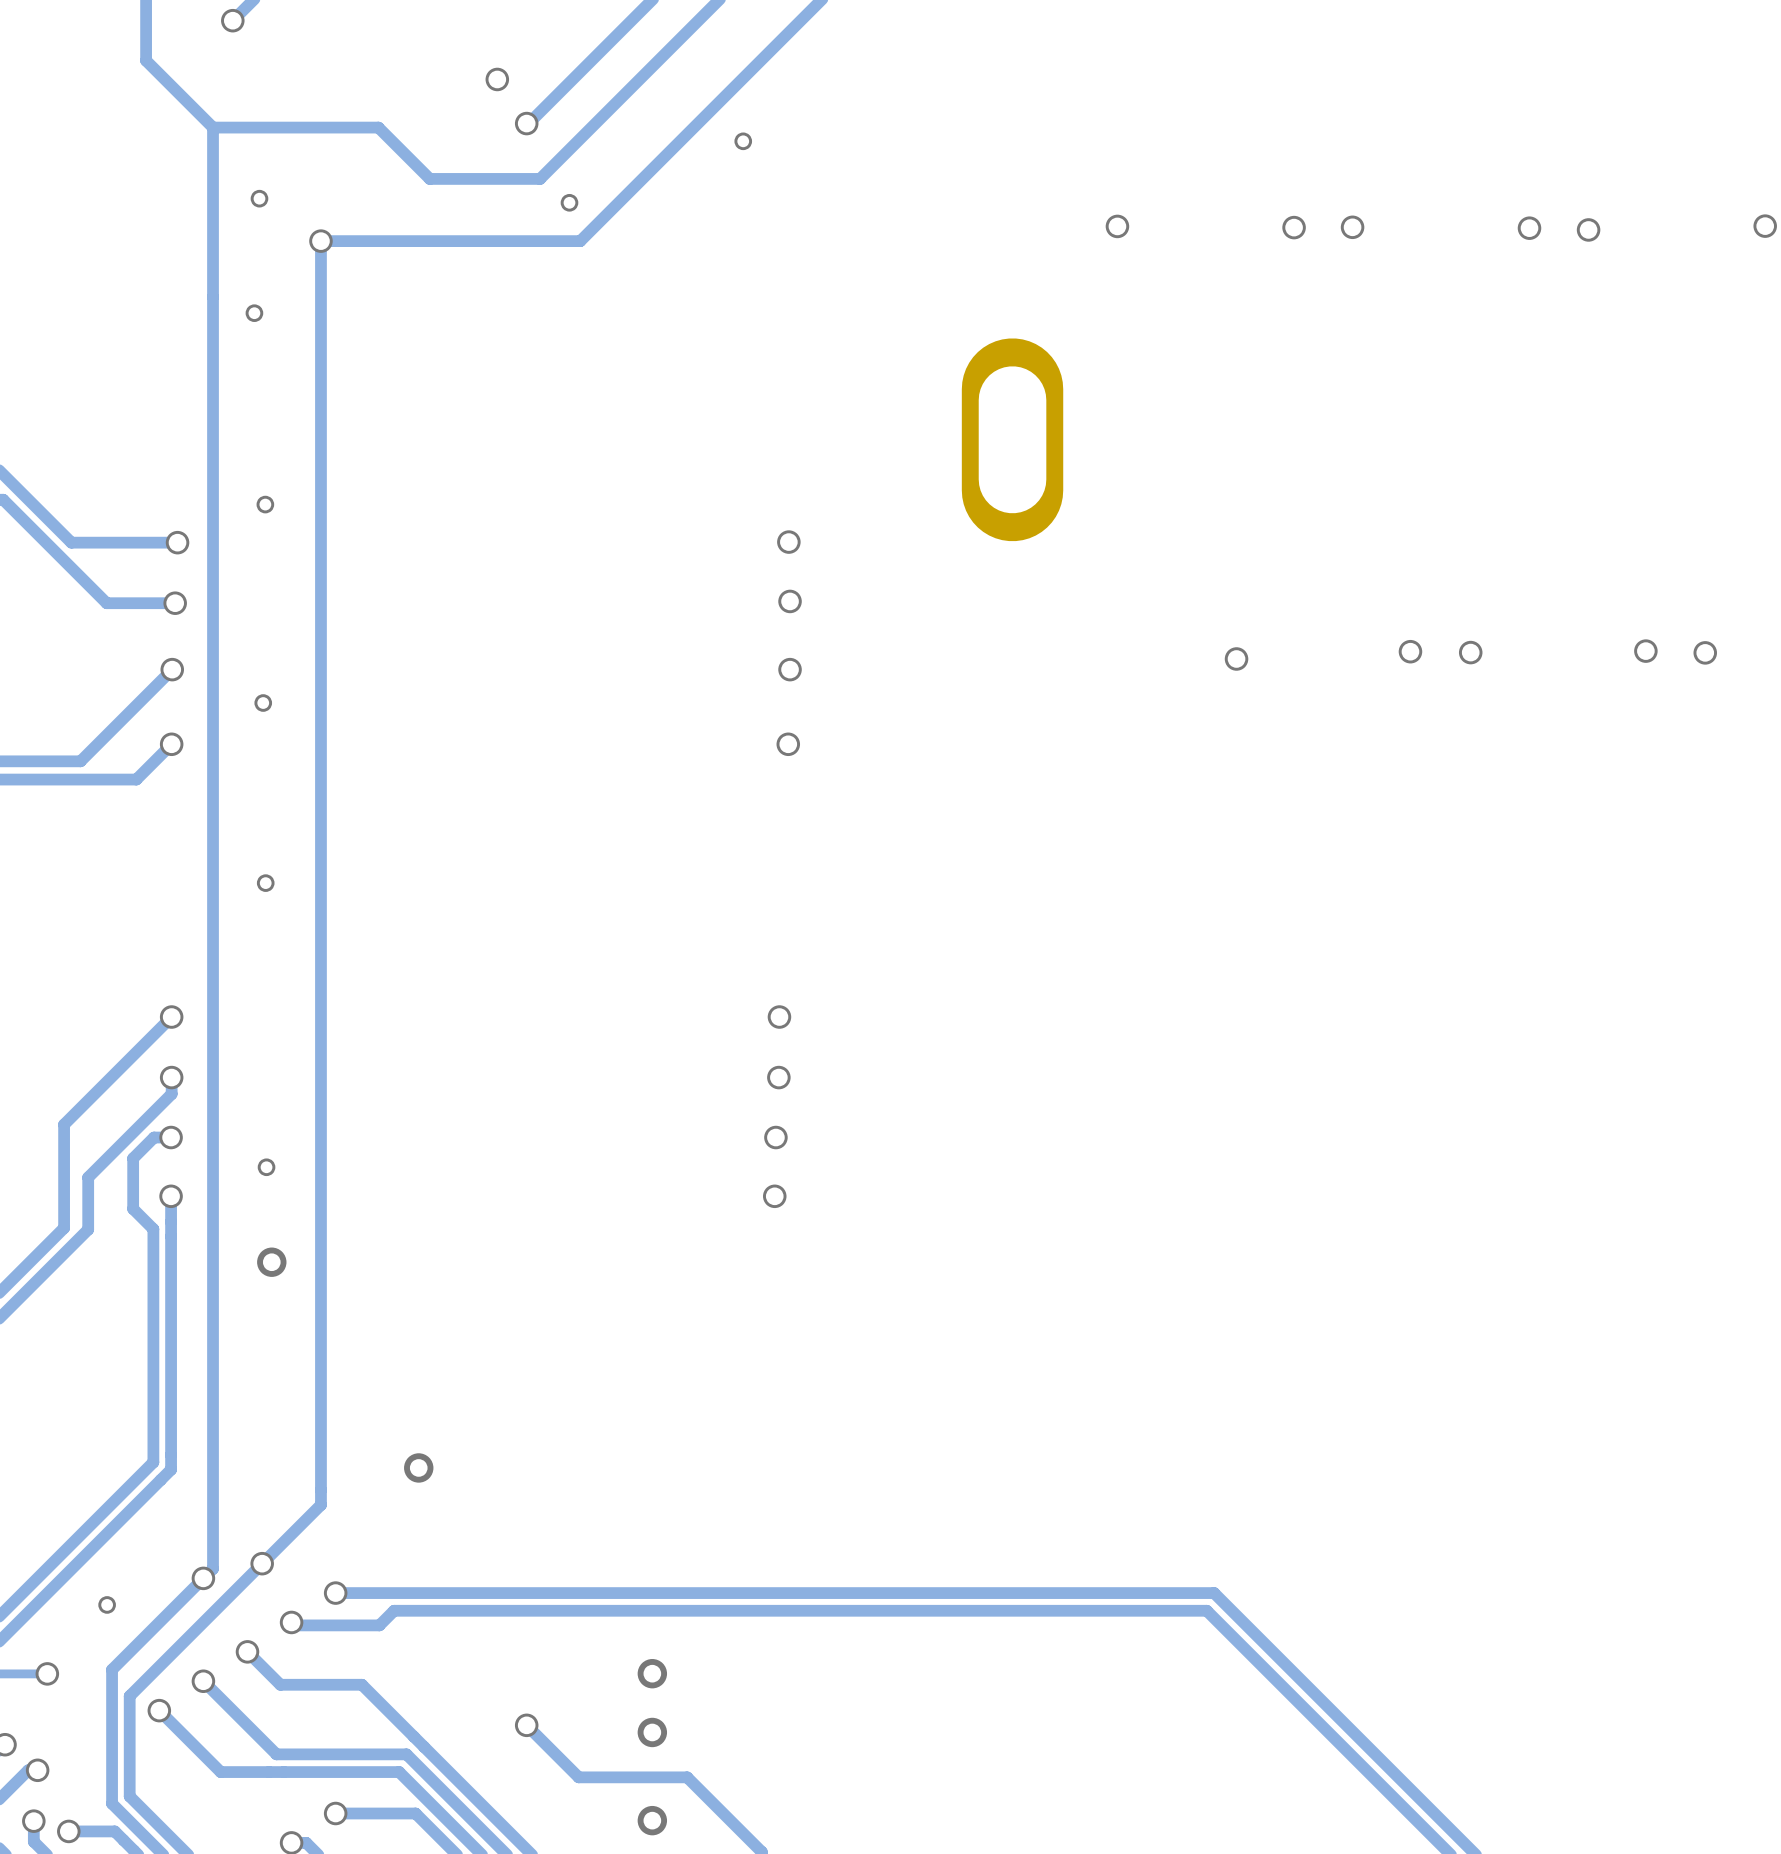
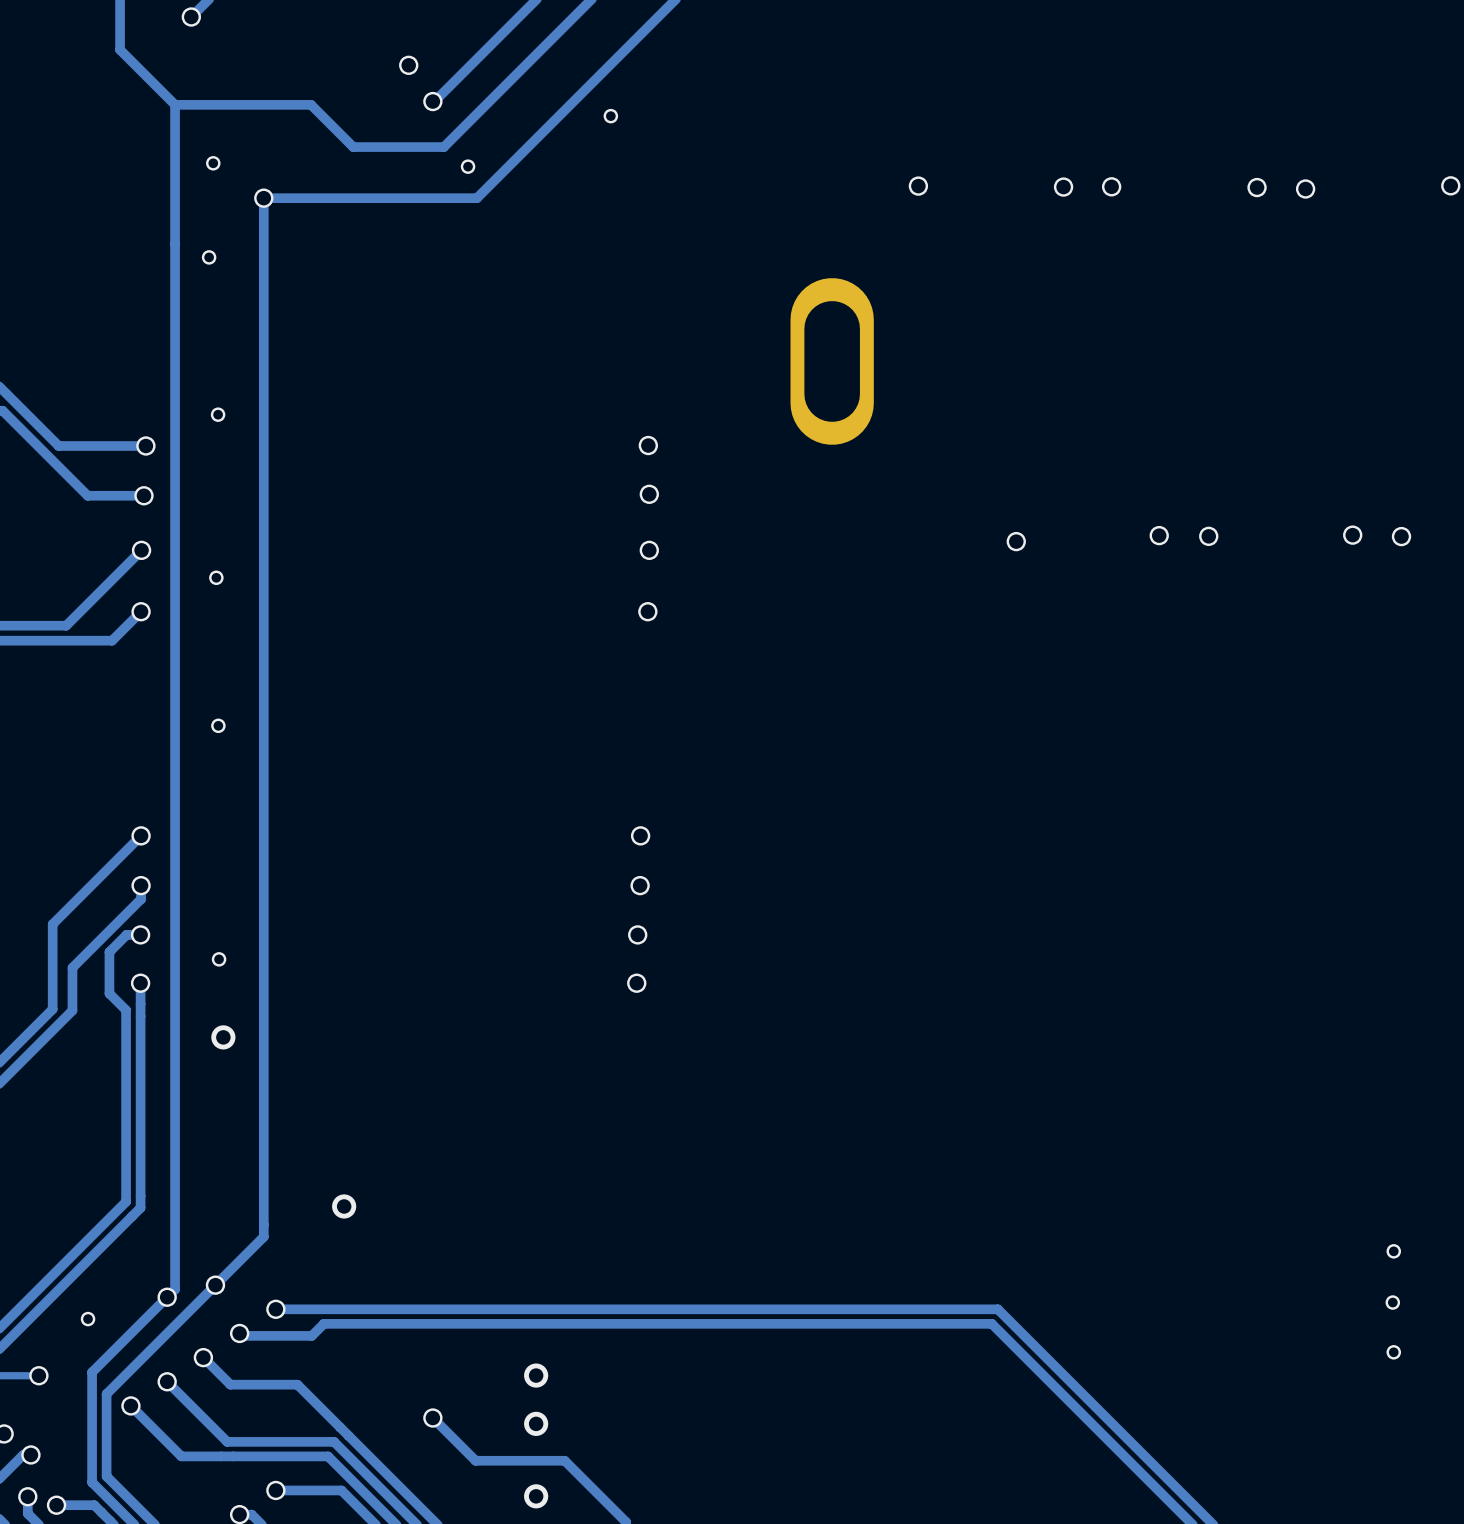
via: none -> (1393, 1251)
via: none -> (1392, 1302)
via: none -> (1393, 1352)

